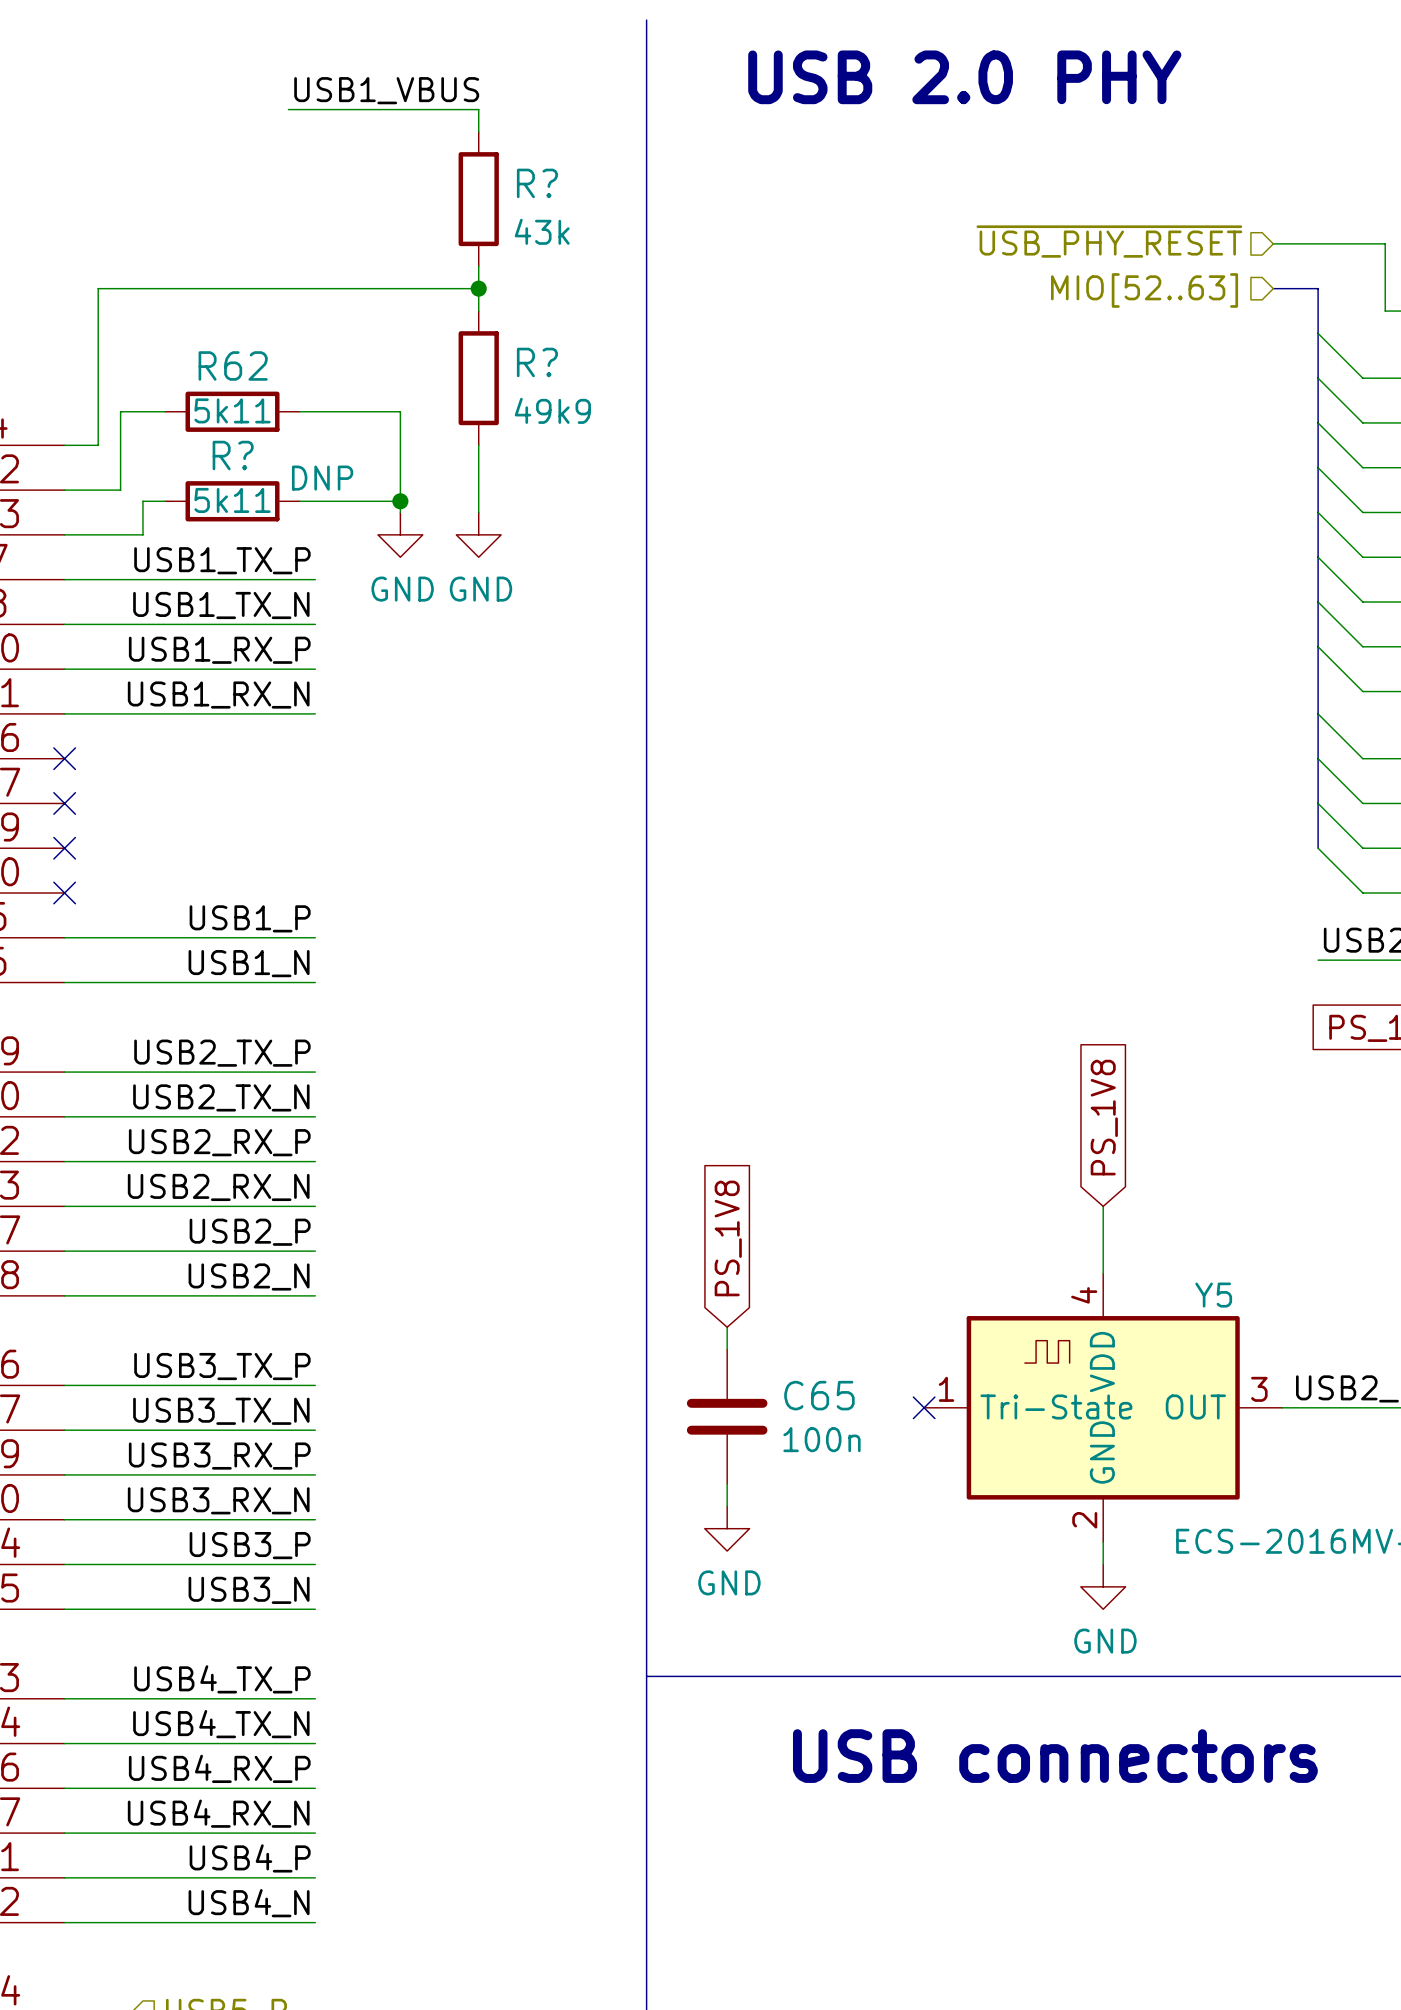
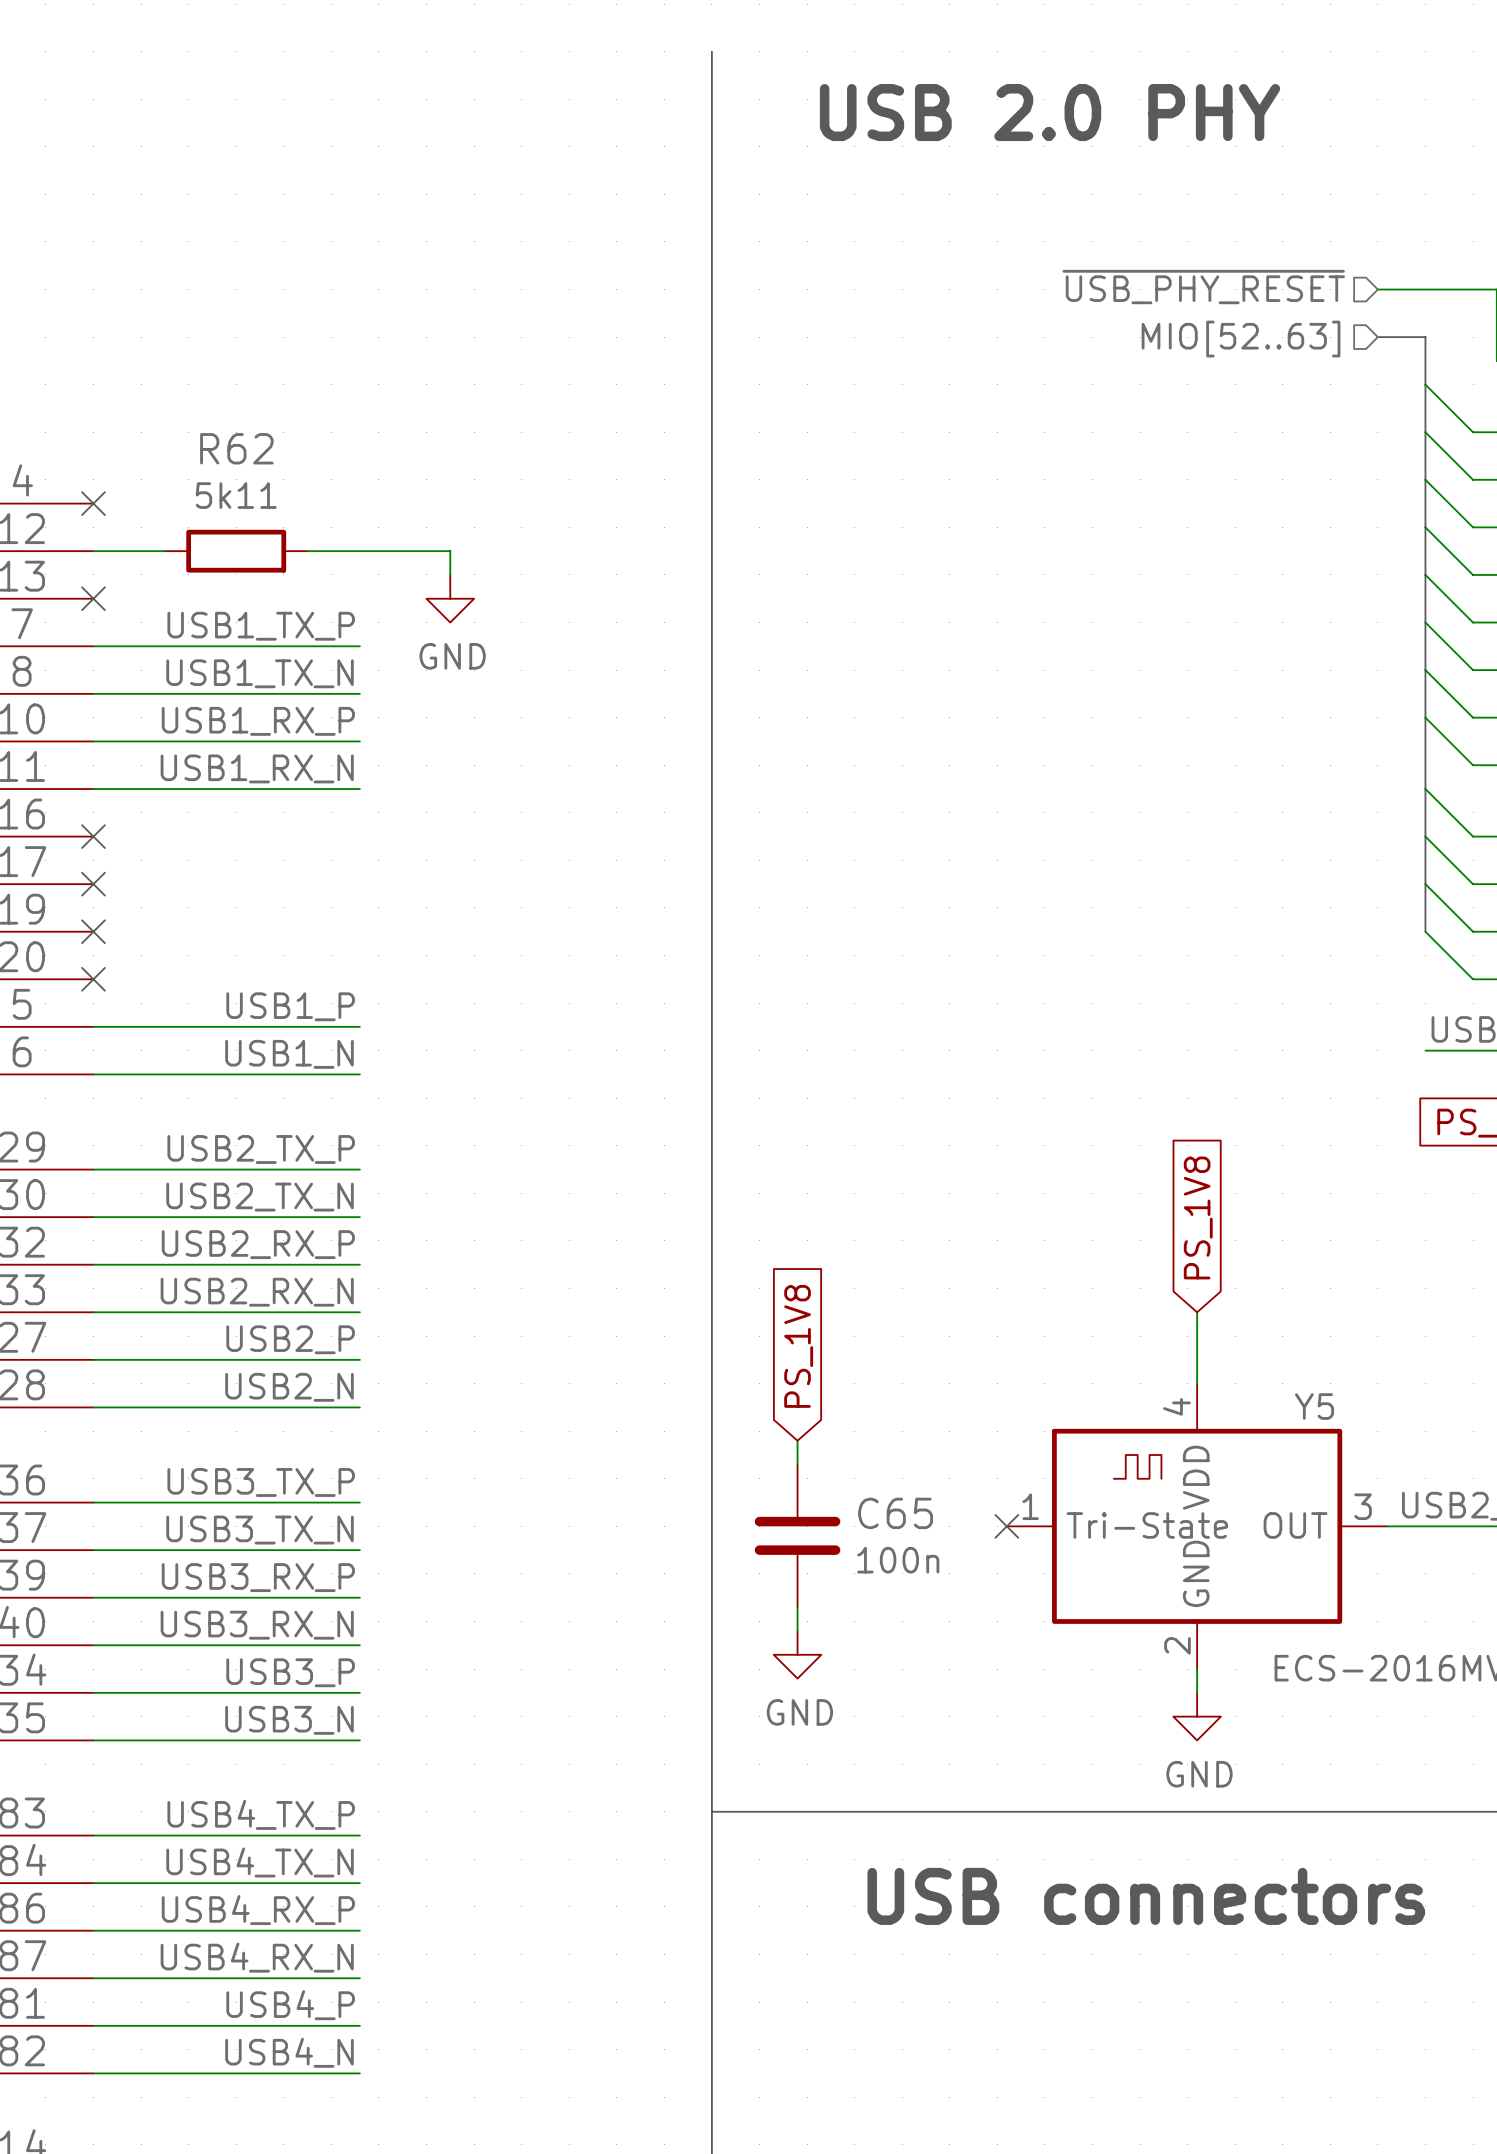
label: USB1_VBUS (386, 90) -> none
wire: (288, 109) (478, 109) (478, 131) -> none
R?: (478, 199) -> none
wire: (478, 266) (478, 311) -> none
wire: (478, 288) (98, 288) (98, 445) (64, 445) -> none
junction: (478, 288) -> none
R62 name position: R62 (233, 365) -> R62 (236, 448)
R?: (478, 378) -> none
R62 text position: 5k11 (232, 410) -> 5k11 (236, 495)
wire: (165, 411) (120, 411) (120, 490) -> (164, 551) (152, 551)
R62 position: (232, 411) -> (236, 551)
wire: (299, 411) (400, 411) (400, 490) -> (307, 551) (450, 551)
no-connect mark: none -> (93, 503)
wire: (478, 445) (478, 512) -> none
wire: (165, 501) (142, 501) (142, 534) (64, 534) -> none
R?: (232, 501) -> none
wire: (299, 501) (400, 501) -> none
junction: (400, 501) -> none
no-connect mark: none -> (93, 598)
power symbol: GND (478, 534) -> none

